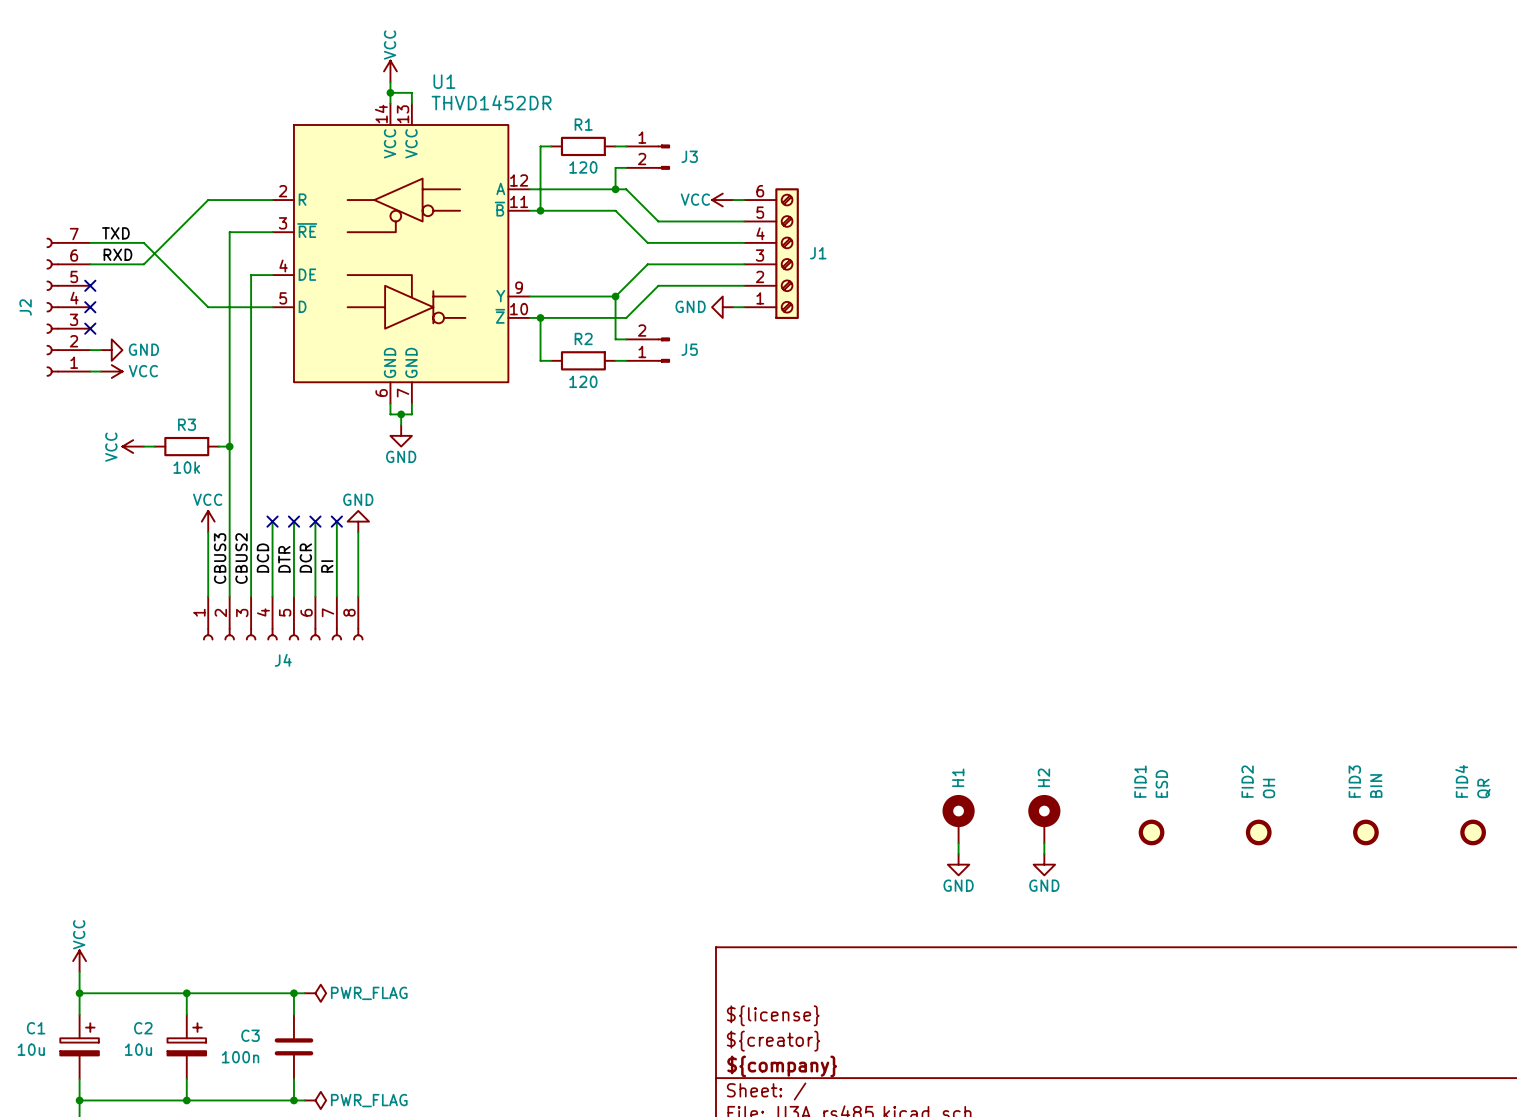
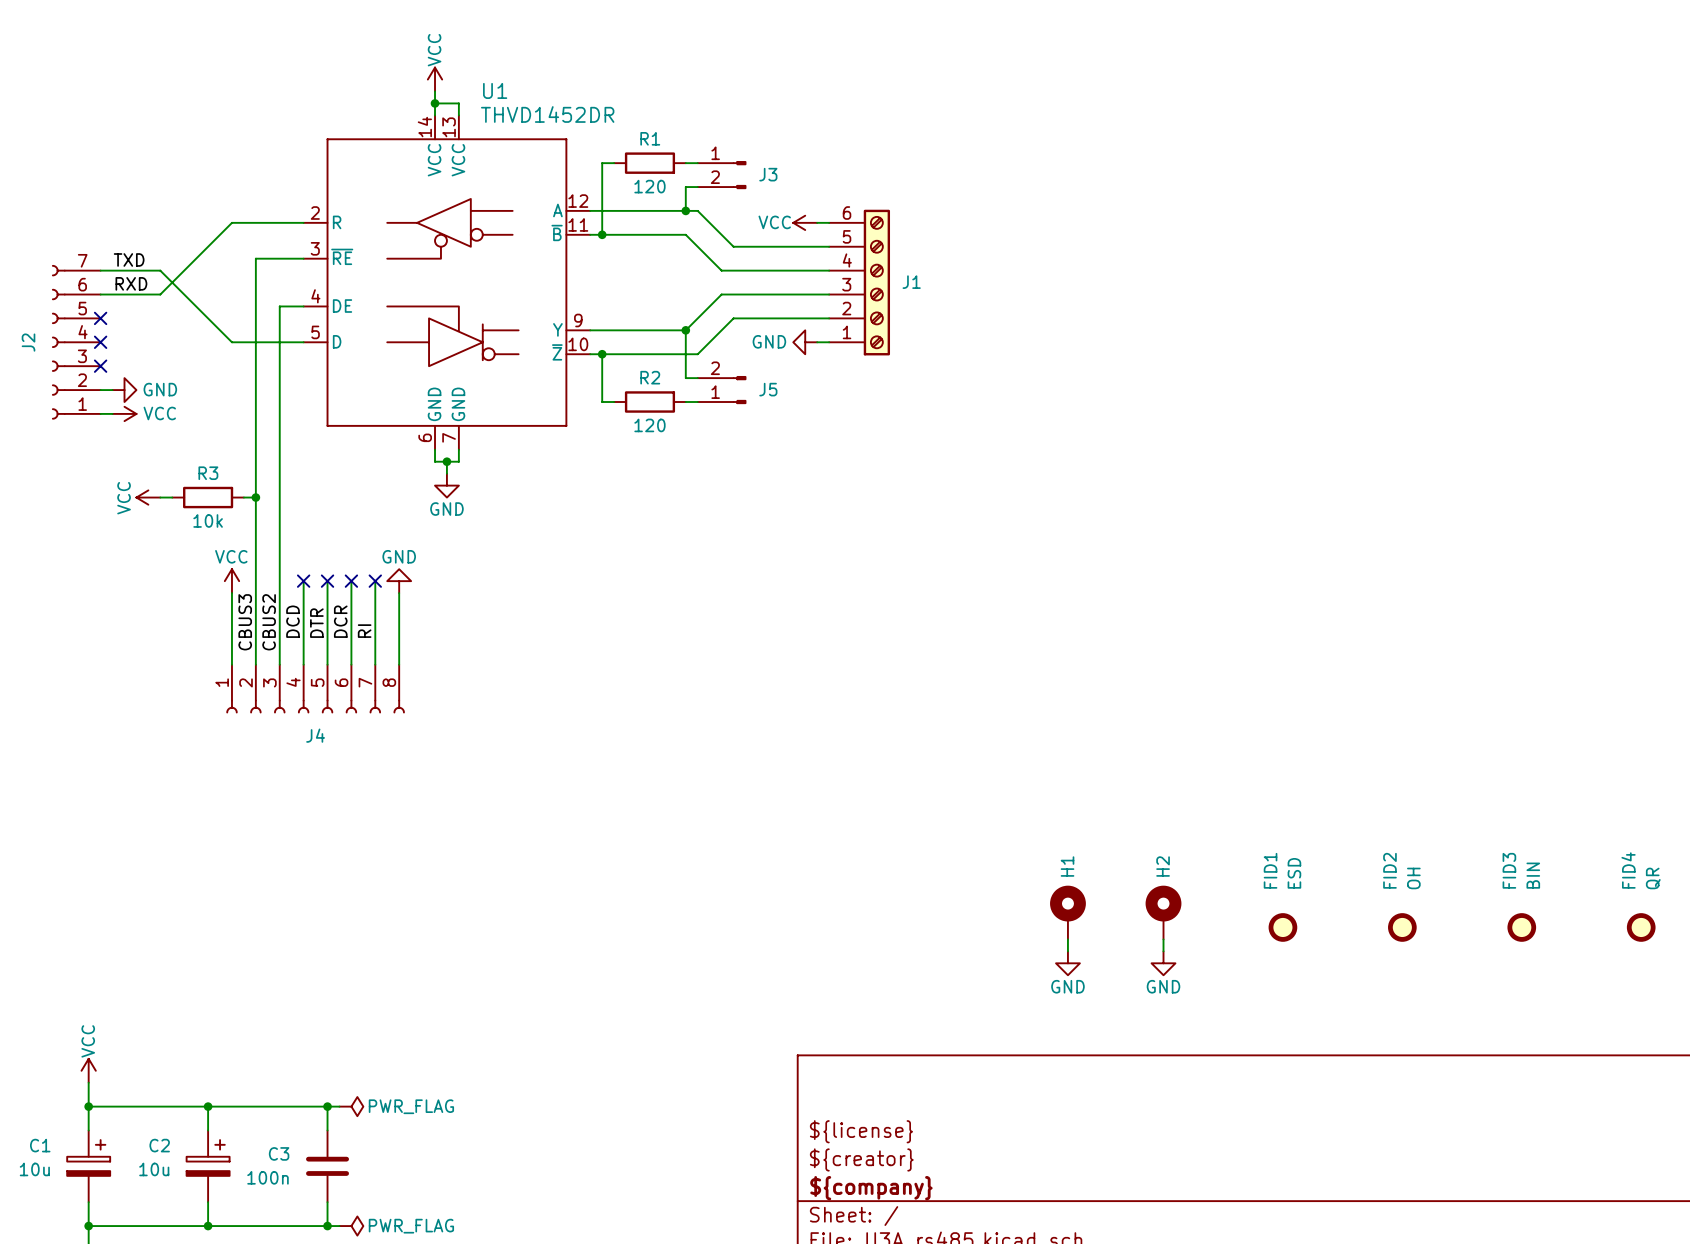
U1 symbol: [272, 103, 530, 404] -> [303, 115, 591, 450]

